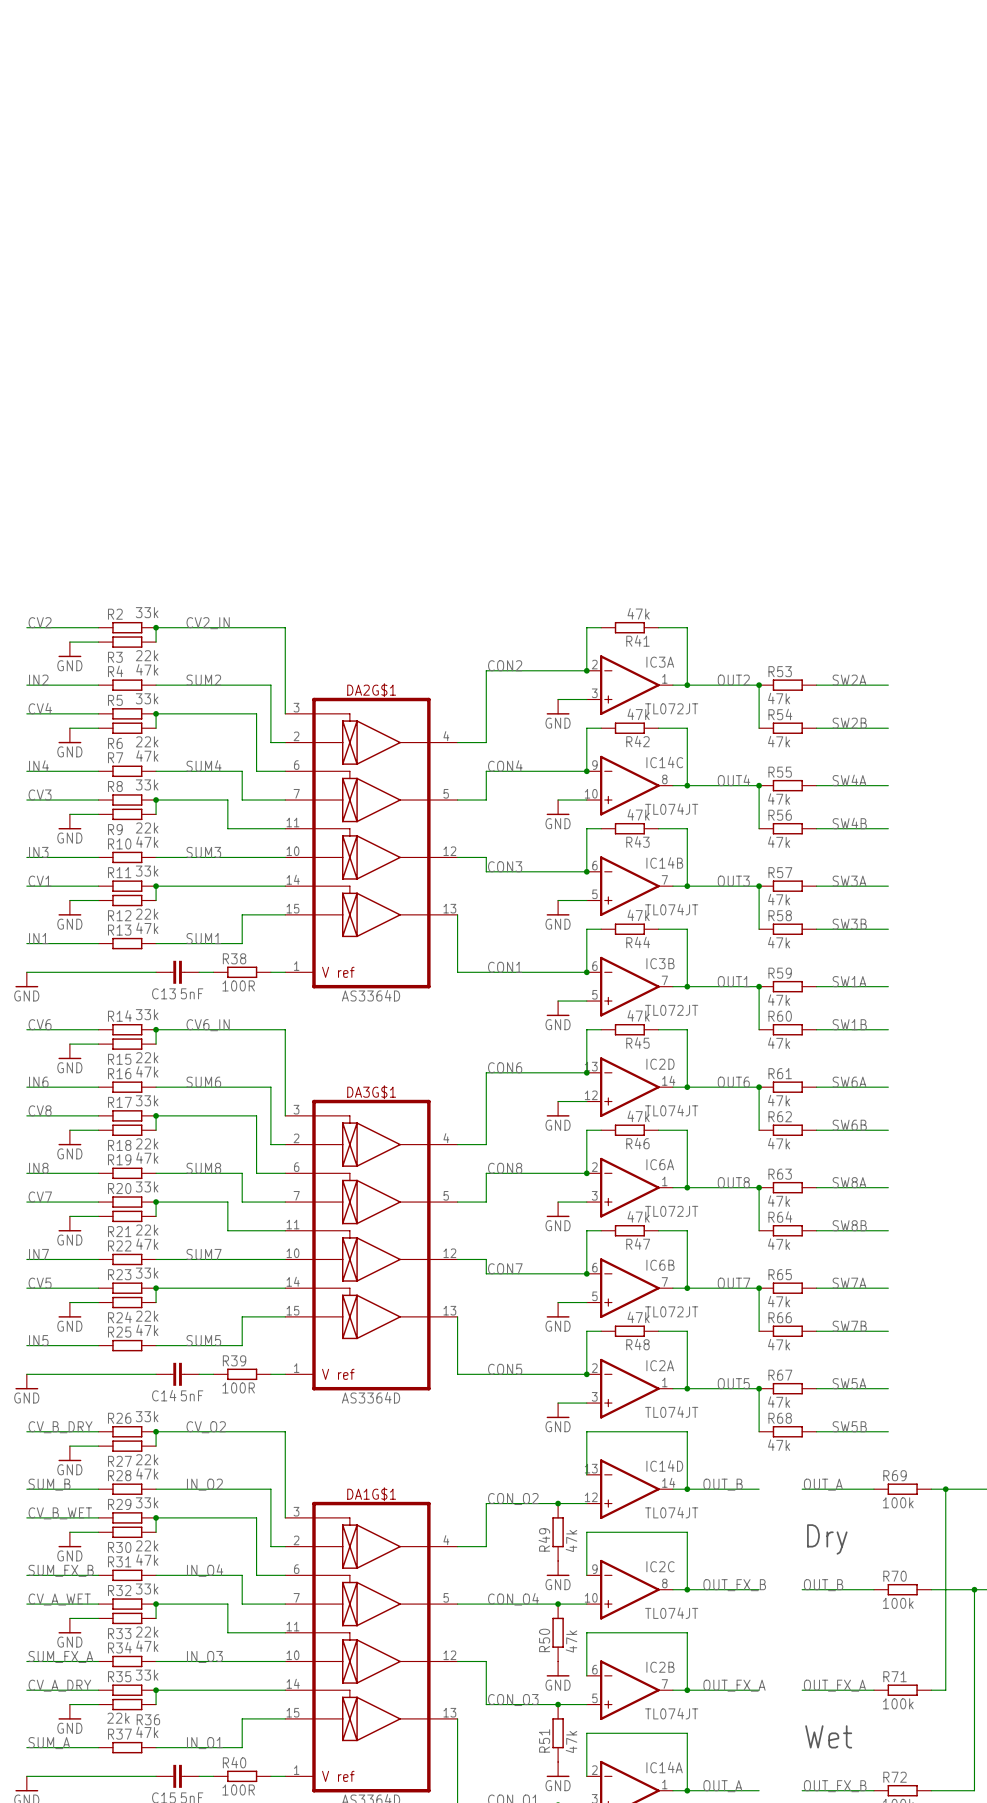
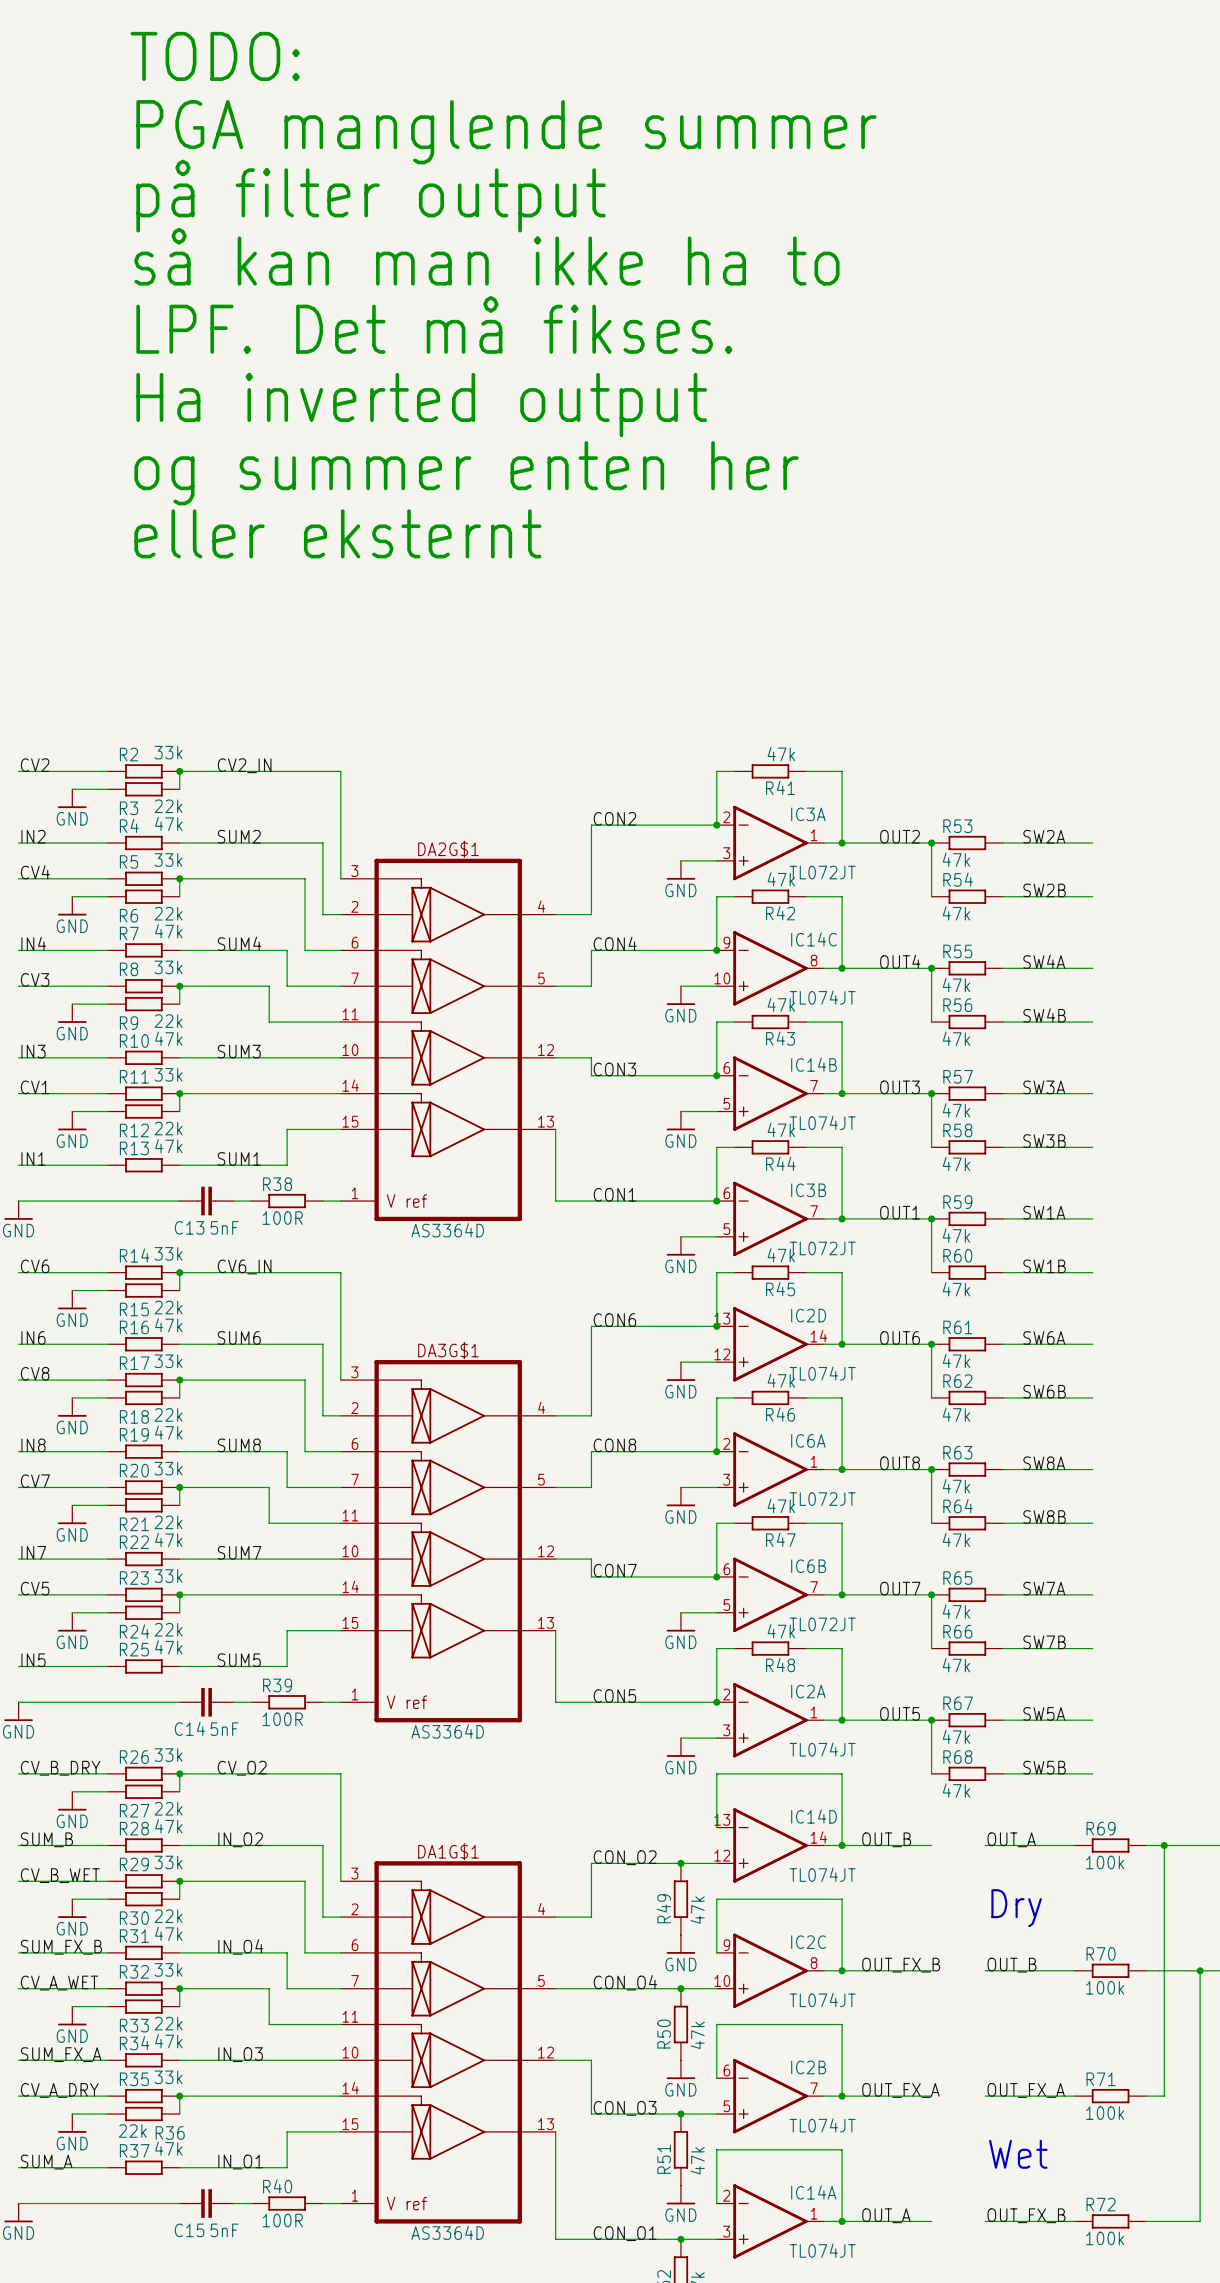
text: none -> TODO: (215, 56)
text: none -> PGA manglende summer (506, 132)
text: none -> på filter output (371, 196)
text: none -> så kan man ikke ha to (486, 256)
text: none -> LPF. Det må fikses. (434, 324)
text: none -> Ha inverted output (421, 405)
text: none -> og summer enten her (466, 473)
text: none -> eller eksternt (337, 533)

